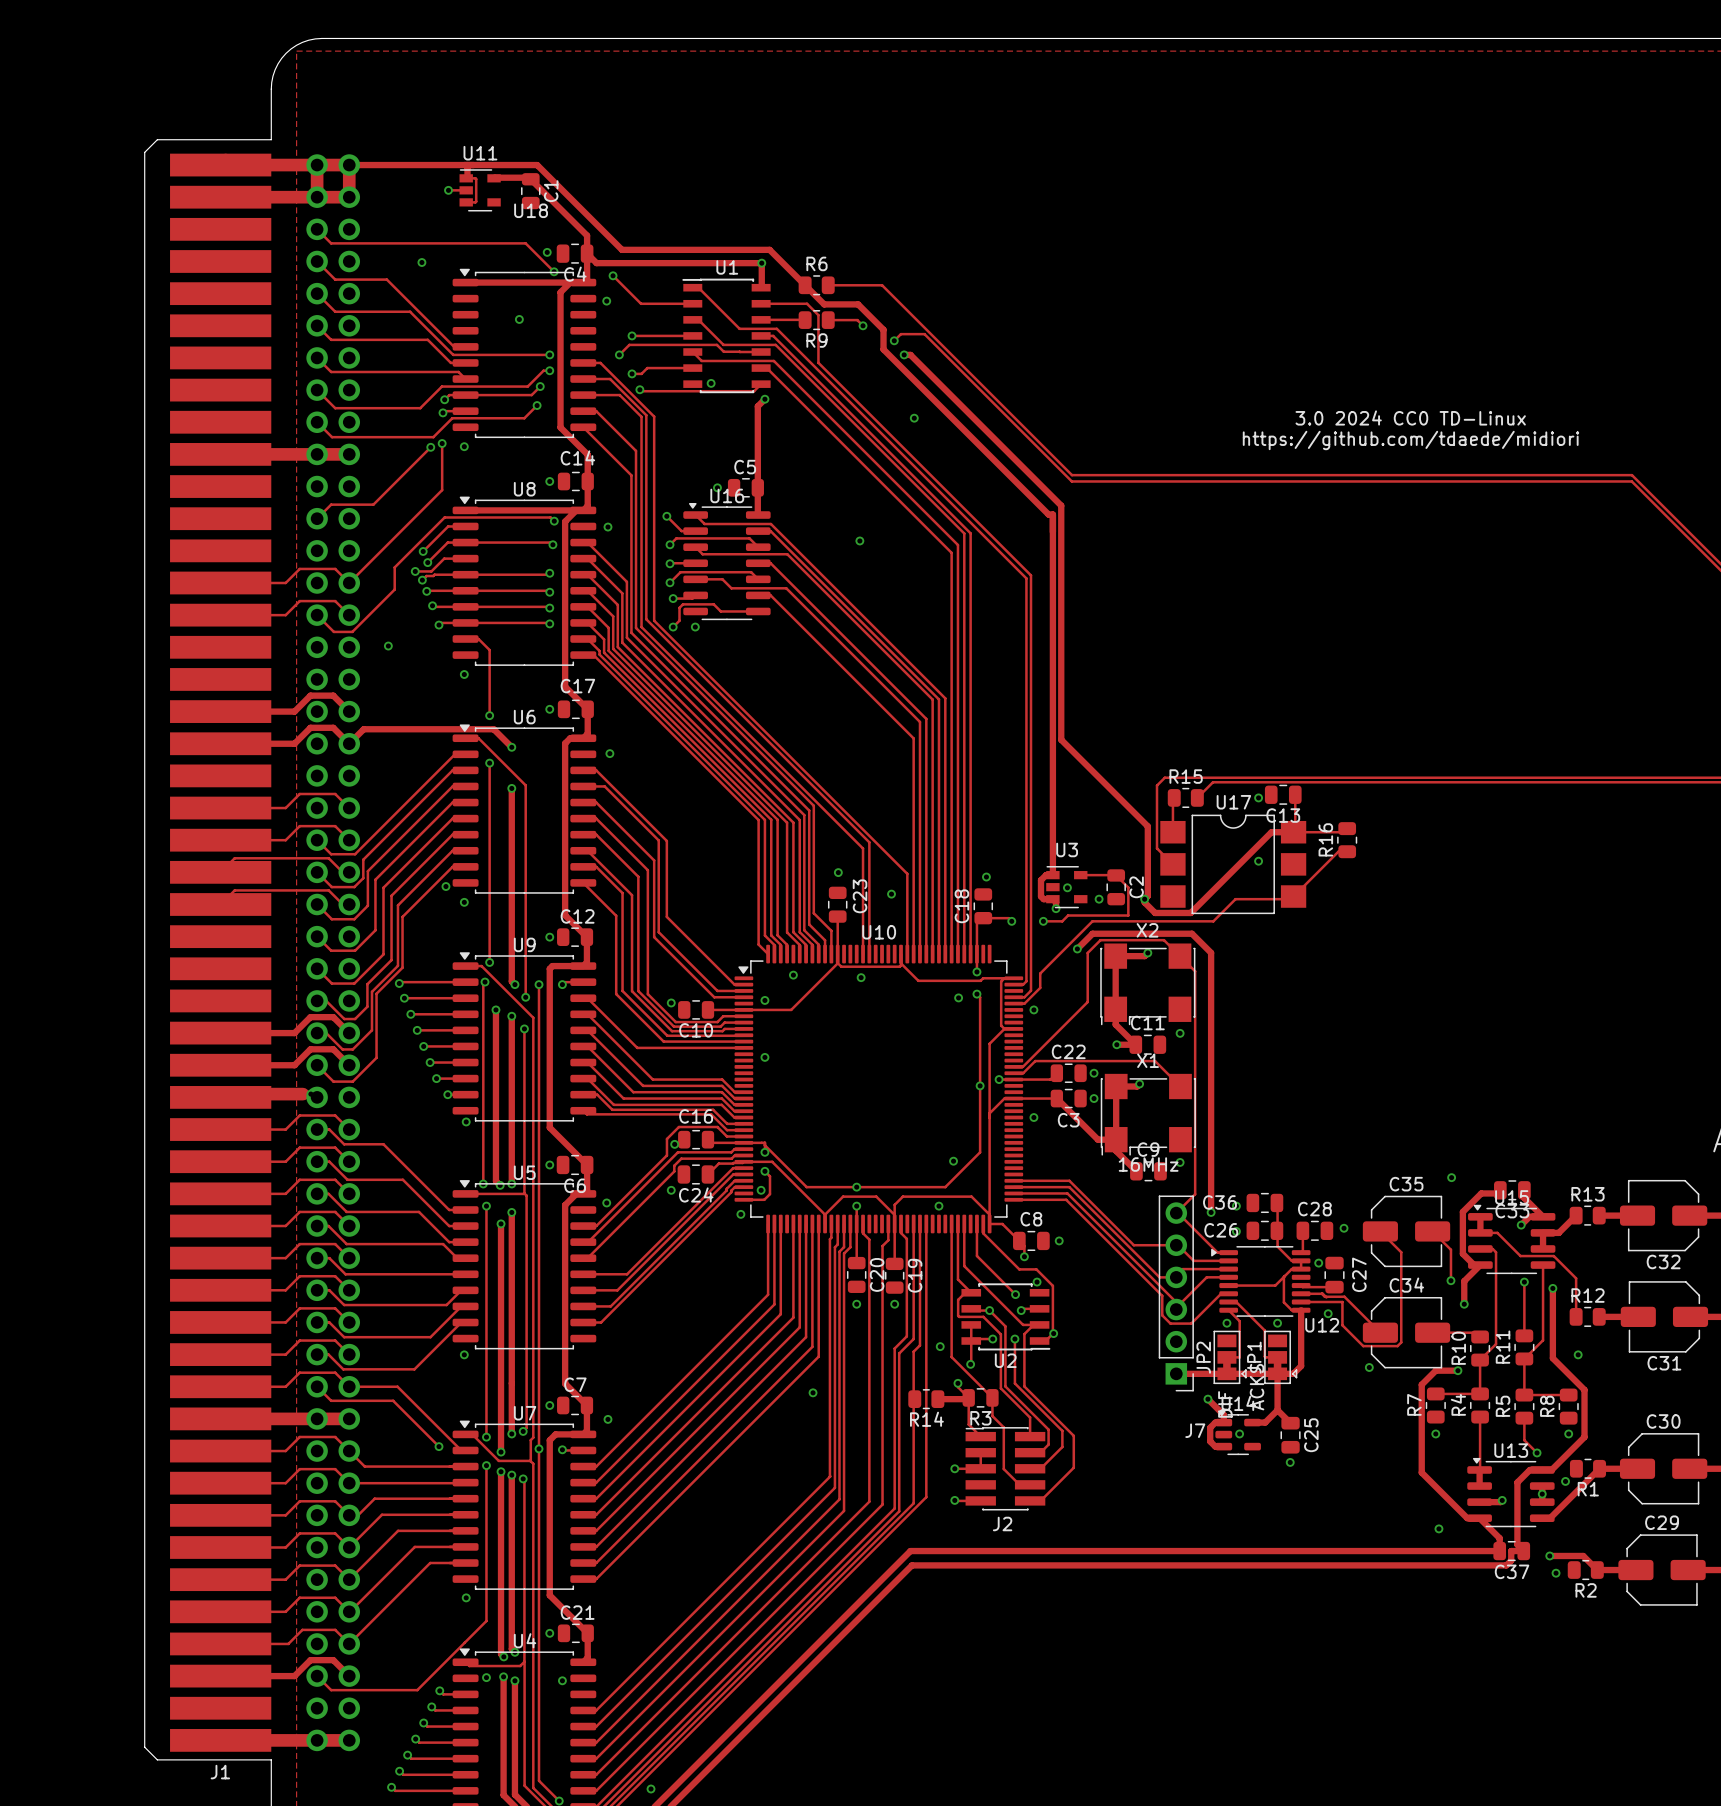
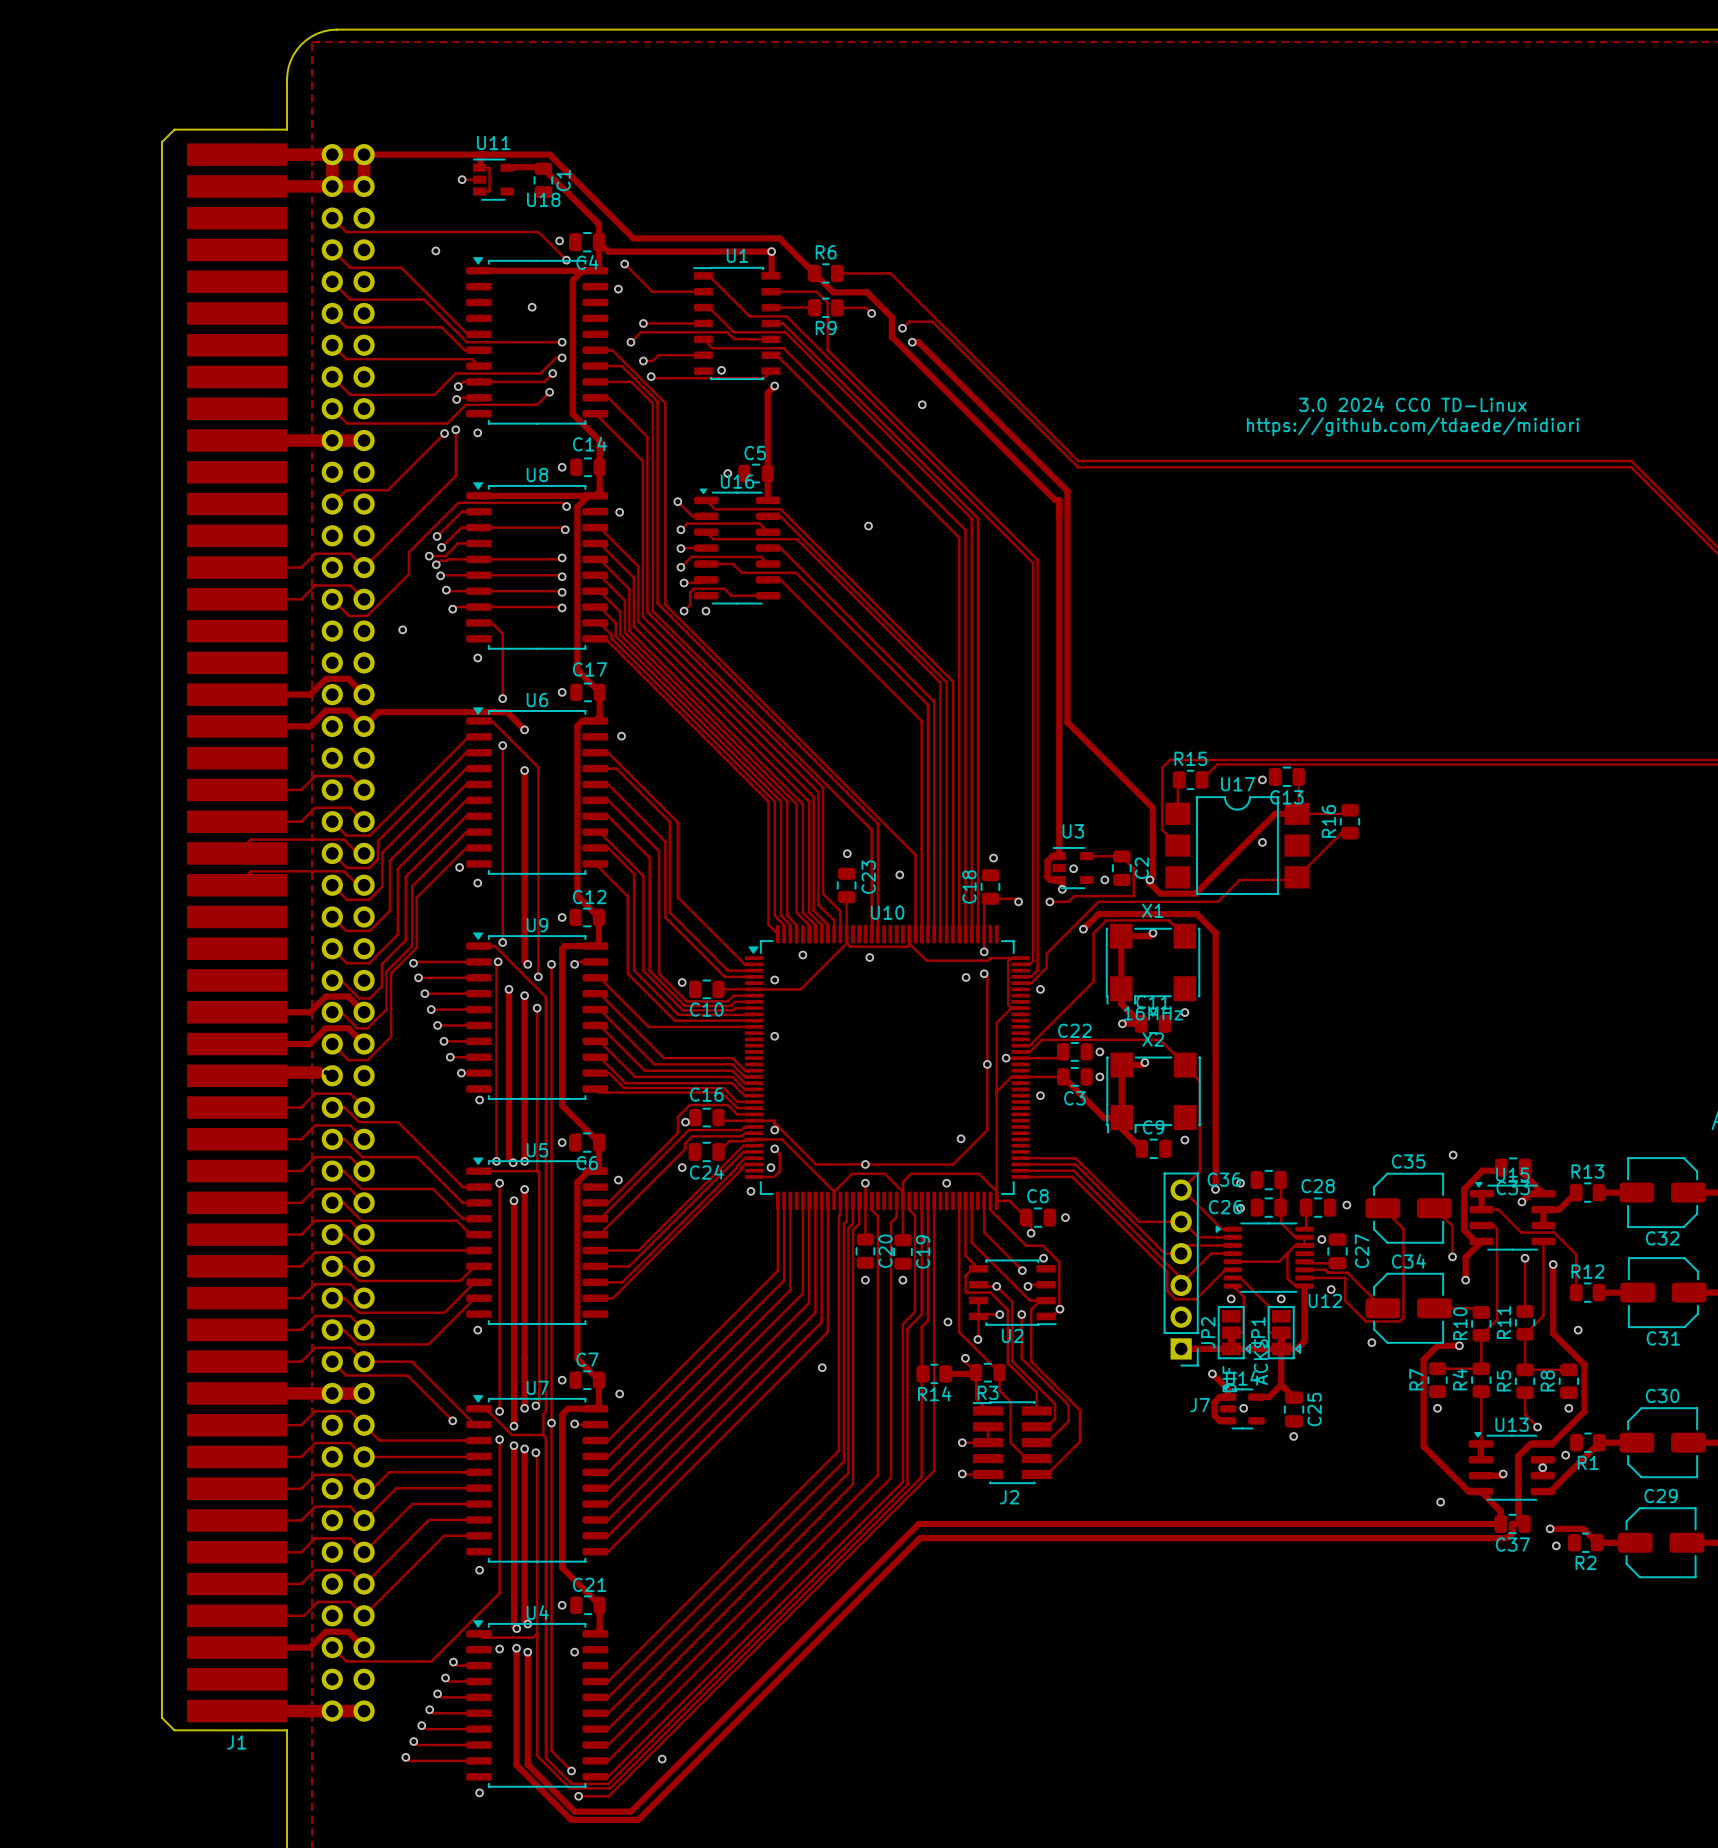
X2 name: X2 (1147, 930) -> X1 (1152, 910)
track: (1179, 956) (1195, 971) (1195, 1194) -> (1184, 1066) (1199, 1081) (1199, 1171)
X2 value: none -> 16MHz (1153, 1013)
X1 name: X1 (1148, 1060) -> X2 (1153, 1039)
X1 value: 16MHz (1148, 1164) -> none

